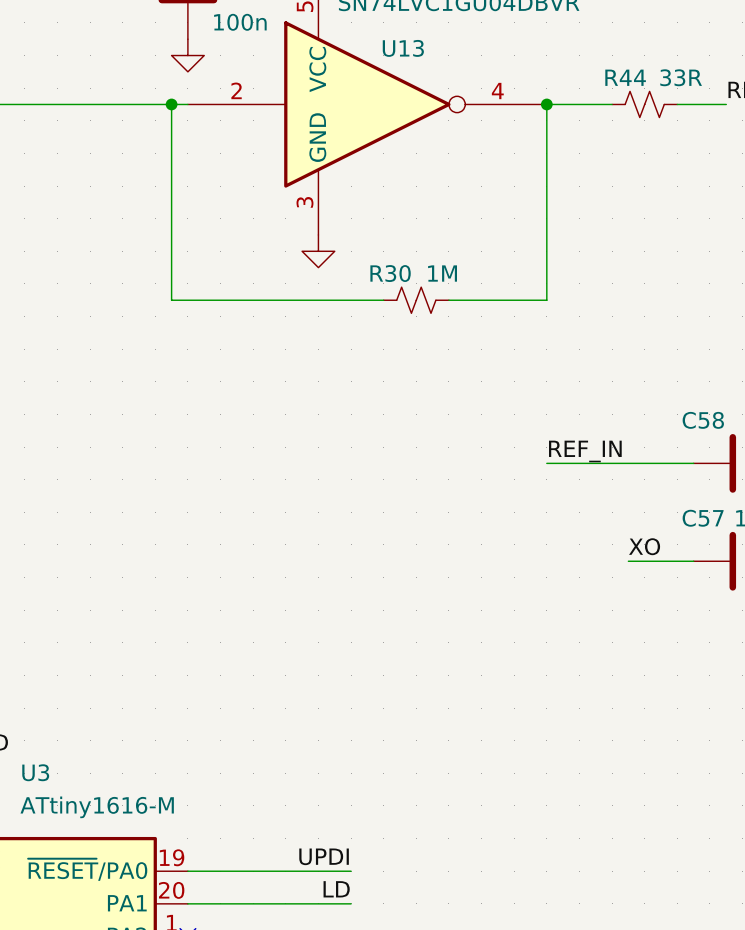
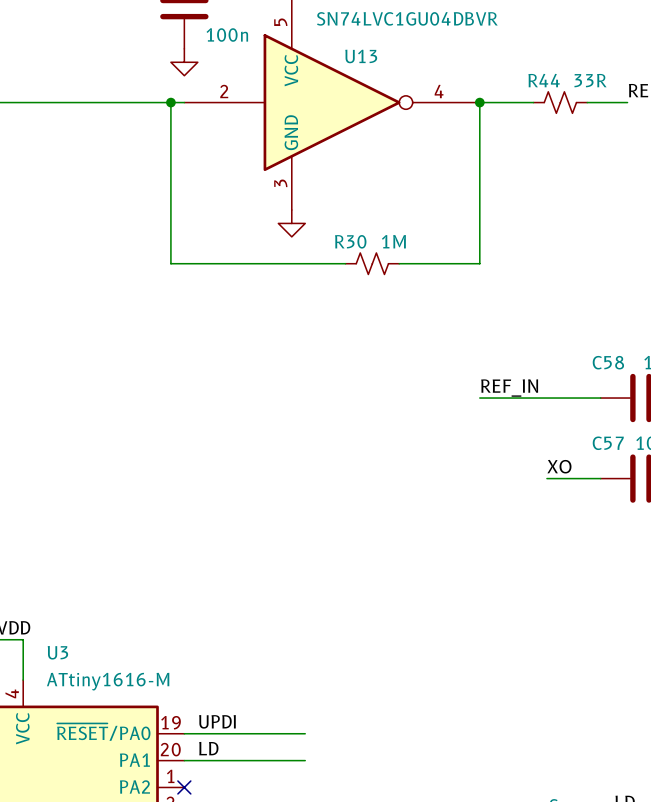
label position: UPDI (324, 856) -> UPDI (217, 721)
wire: (334, 871) (351, 871) -> none
label position: LD (336, 889) -> LD (208, 748)
wire: (334, 903) (351, 903) -> none

